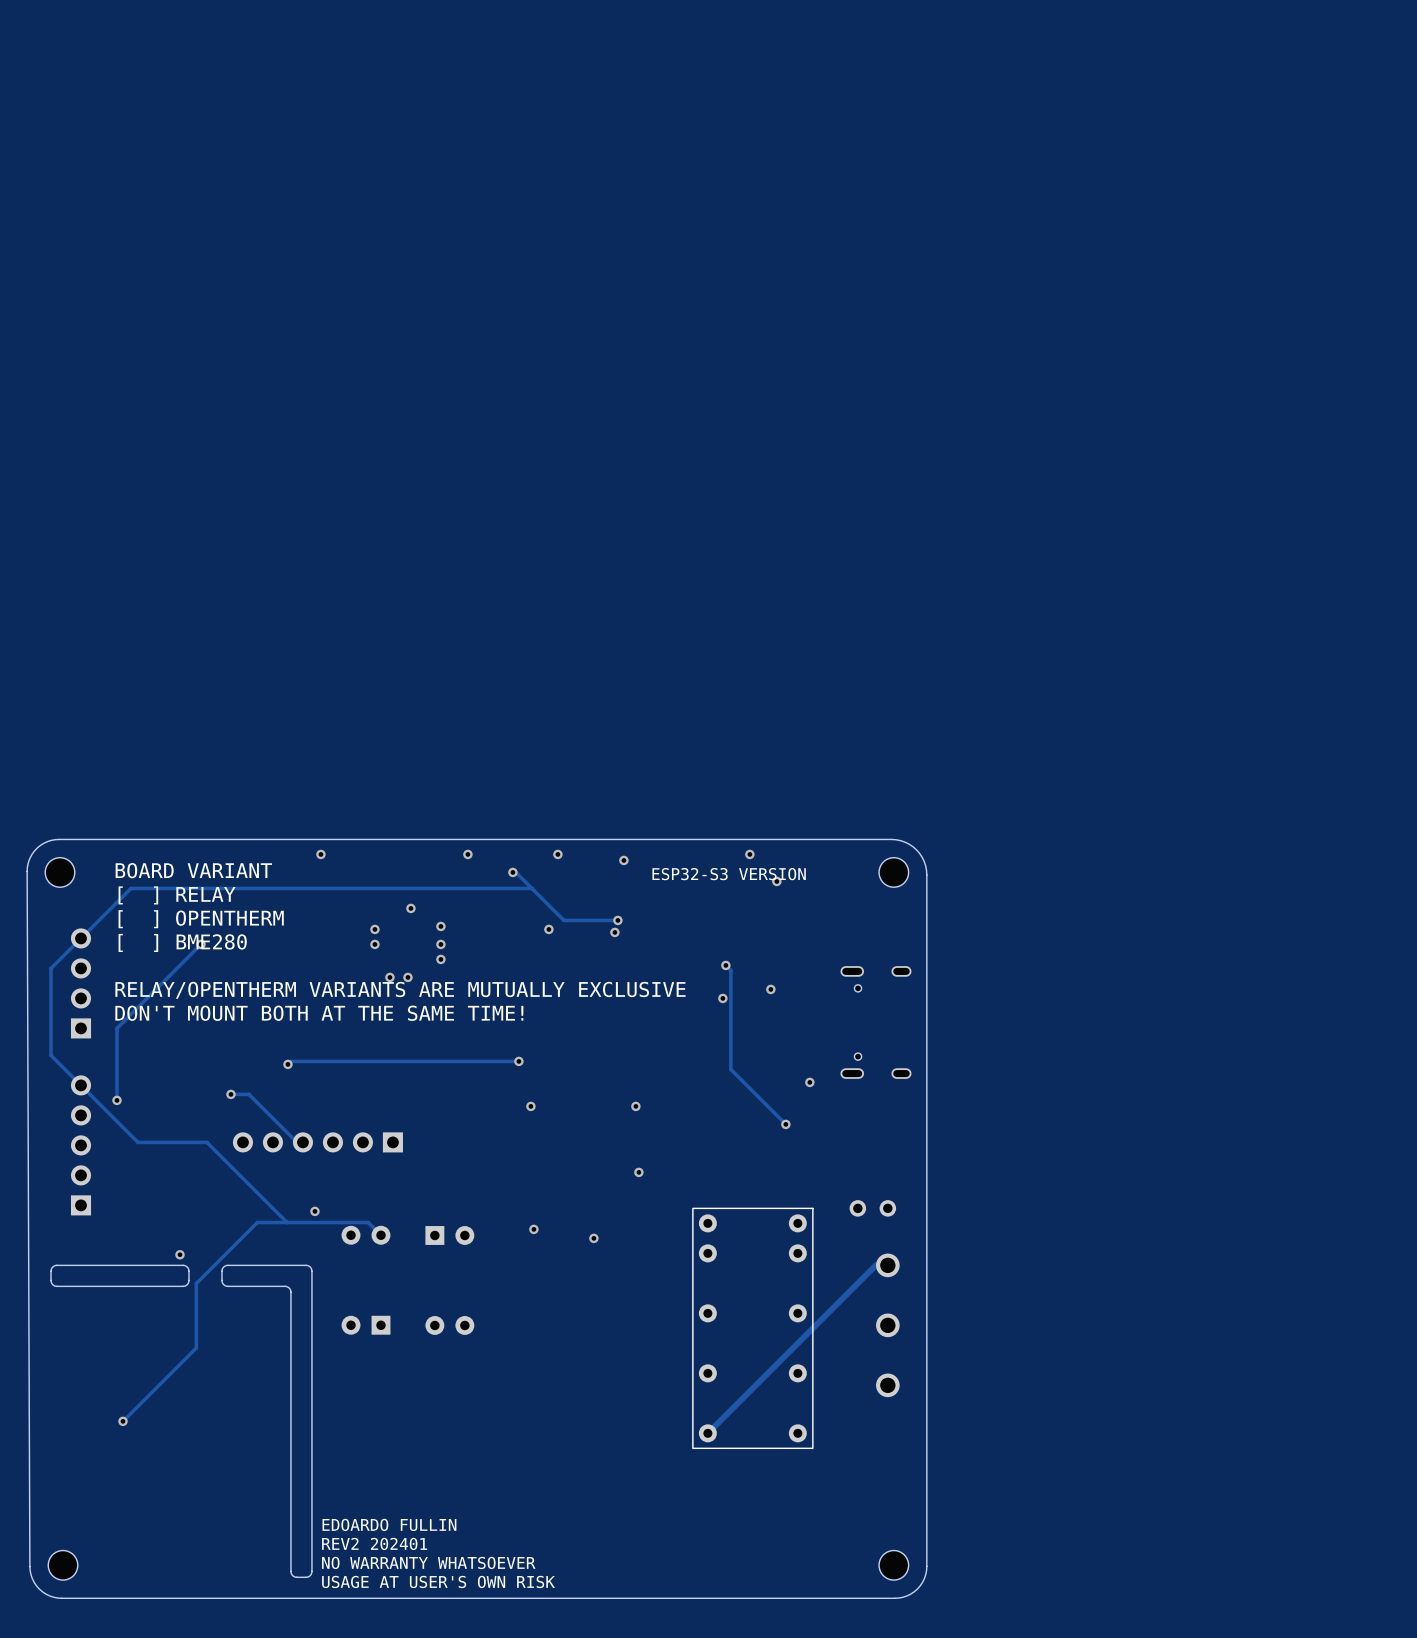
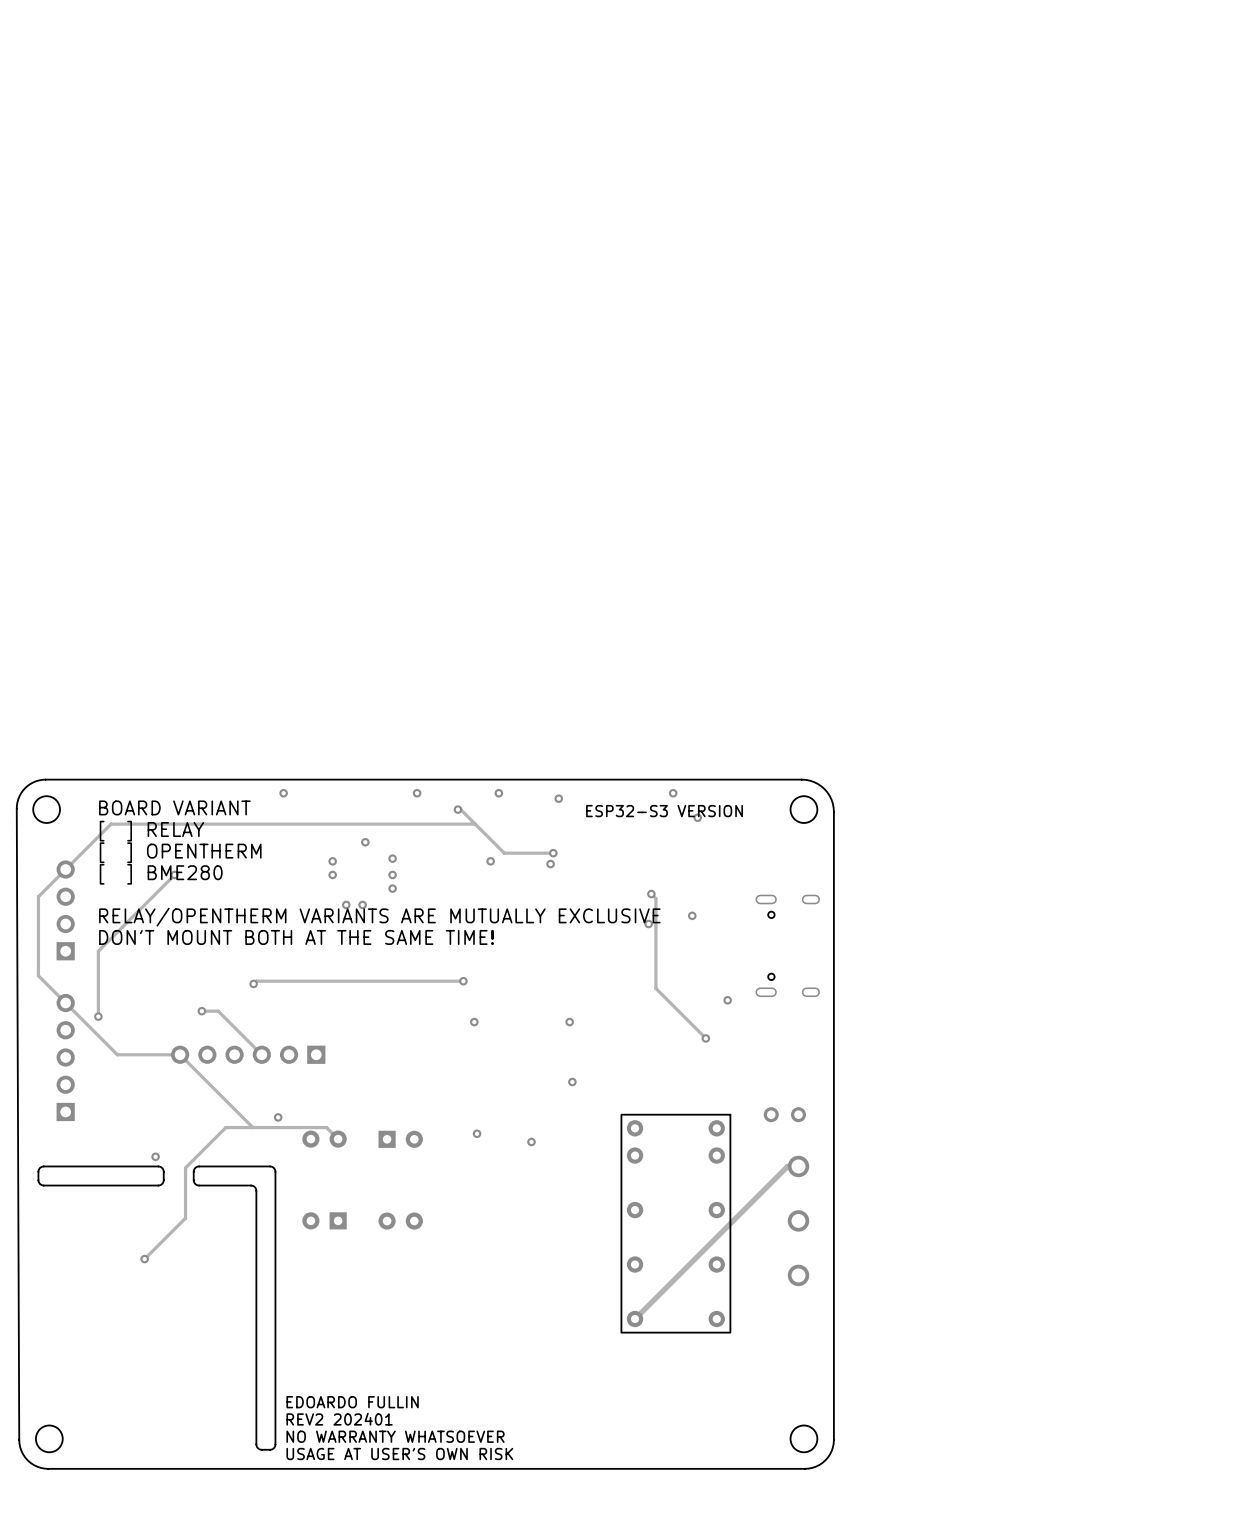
part position: (317, 1142) -> (248, 1054)
track: (212, 1266) (196, 1283) (196, 1347) (122, 1421) -> (185, 1167) (185, 1218) (144, 1259)
via position: (122, 1421) -> (144, 1259)

